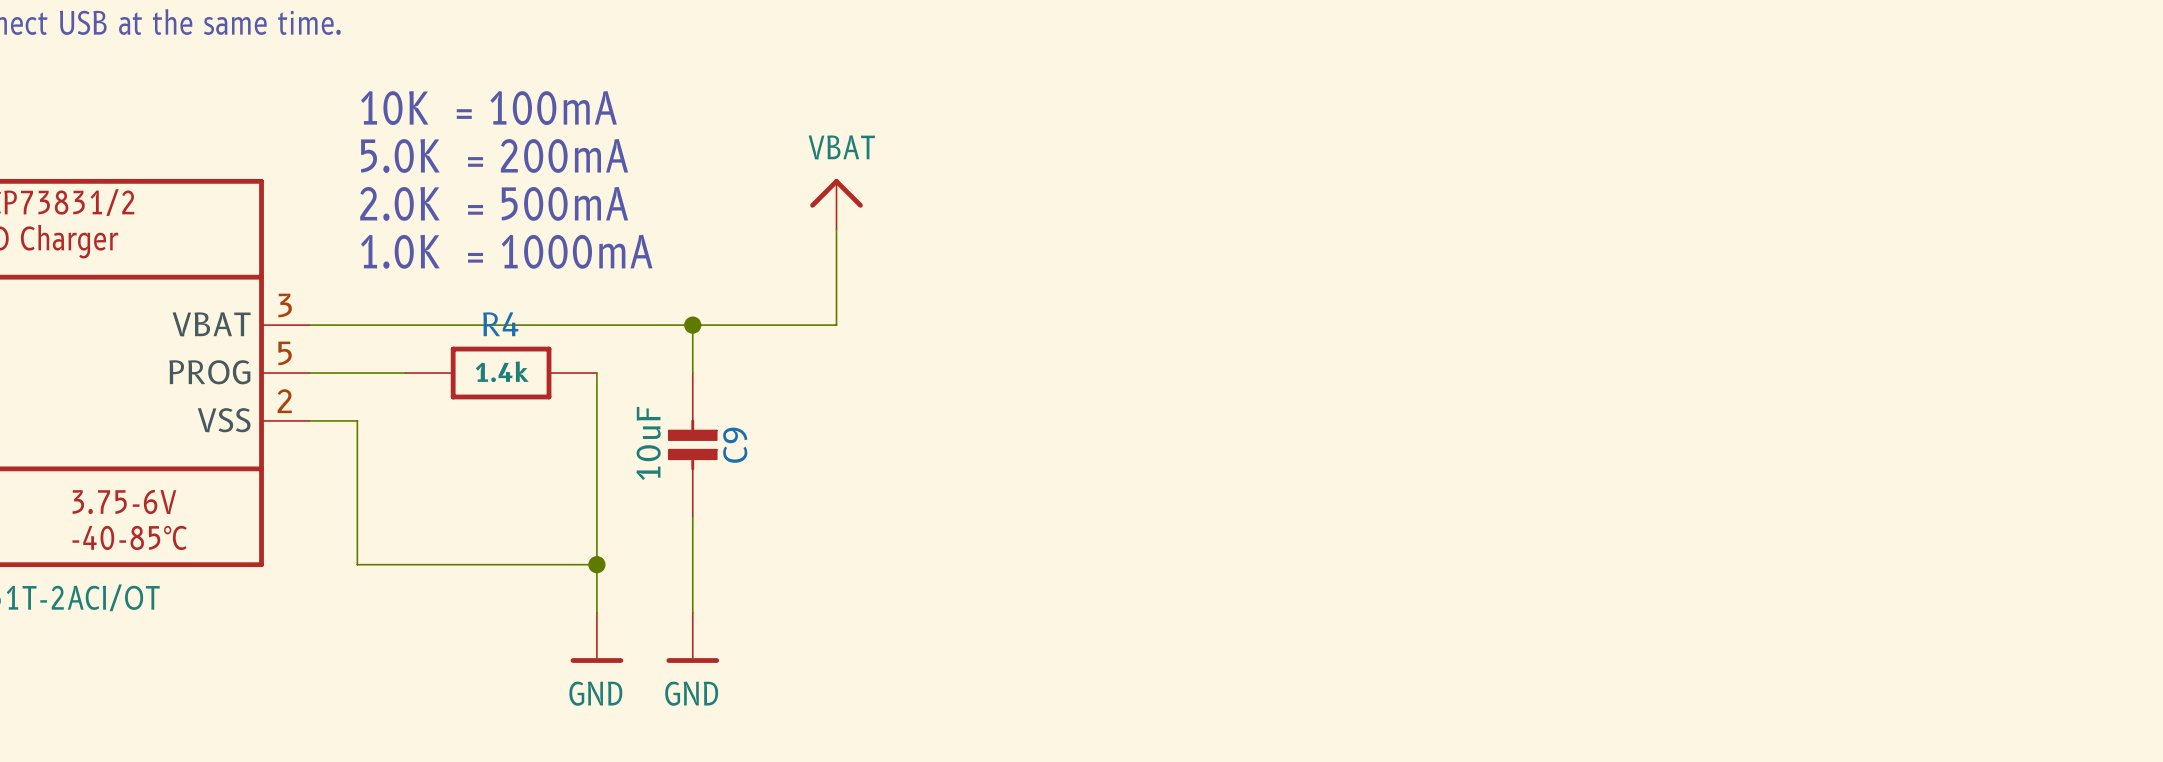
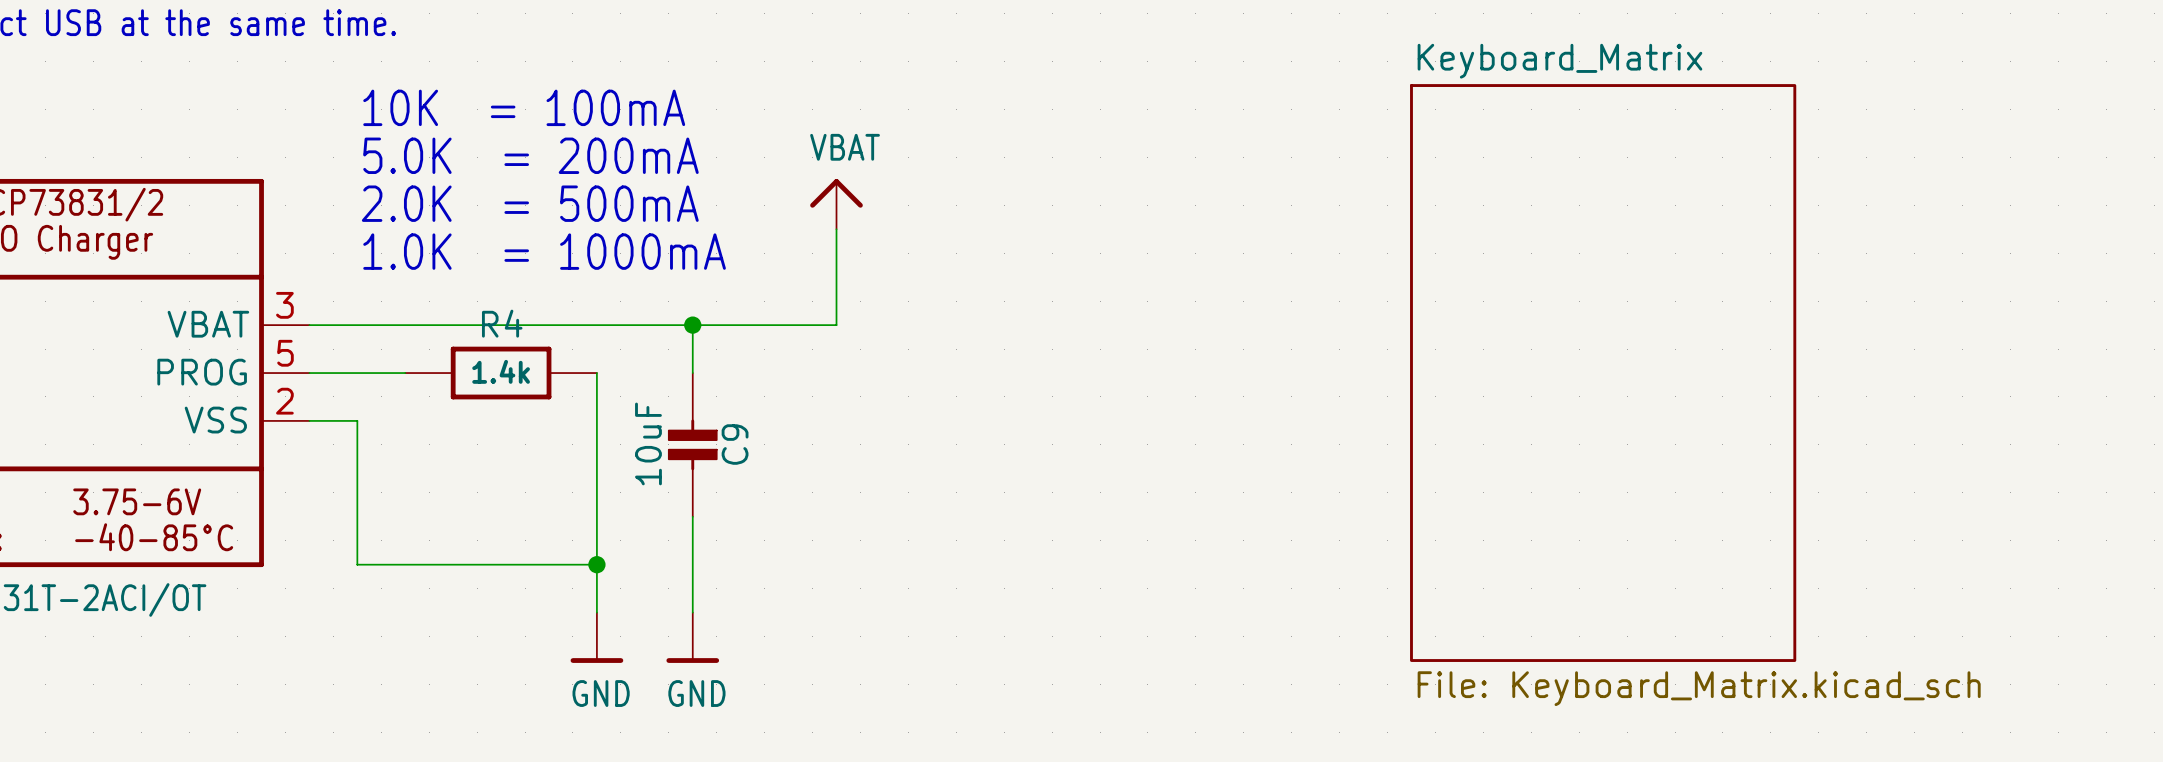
sheet Keyboard_Matrix: none -> File: Keyboard_Matrix.kicad_sch (1603, 373)

